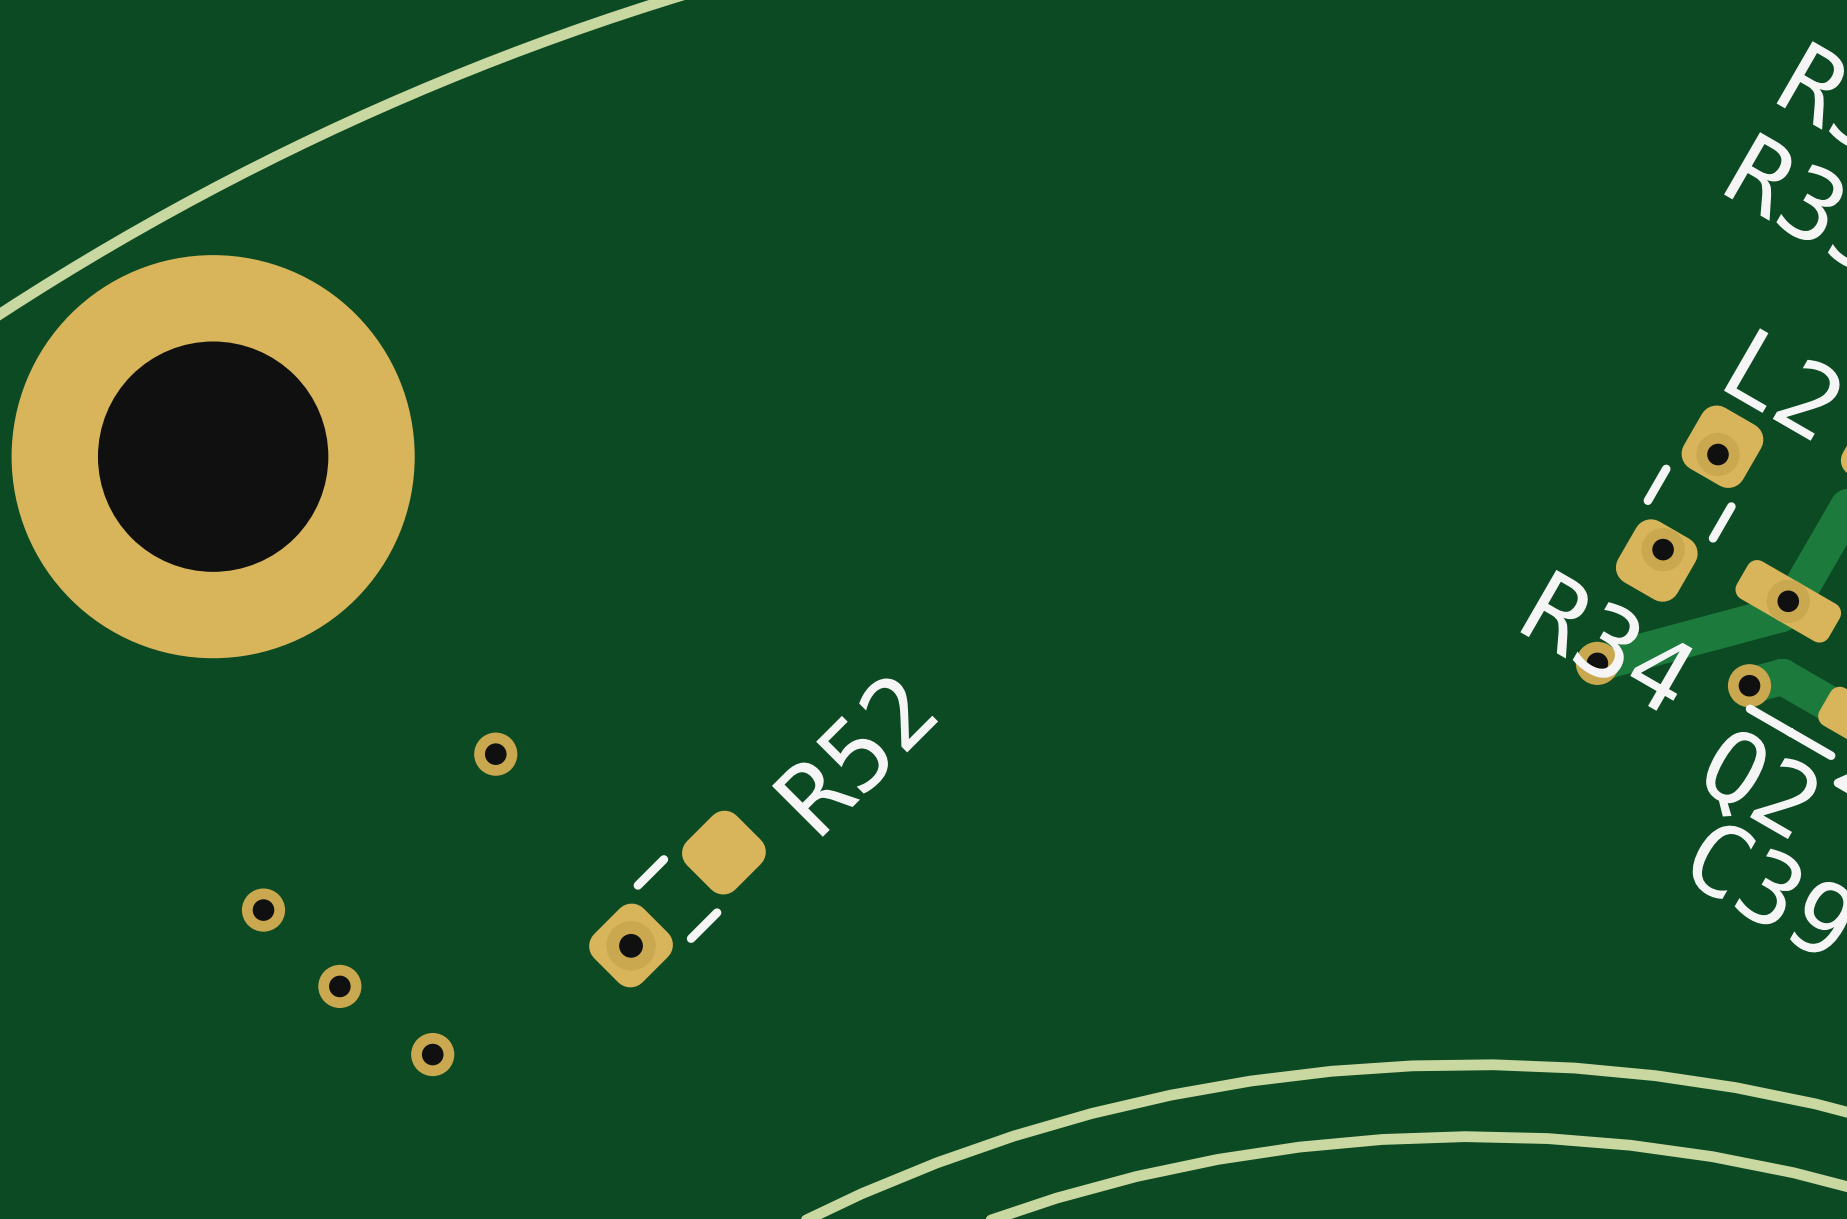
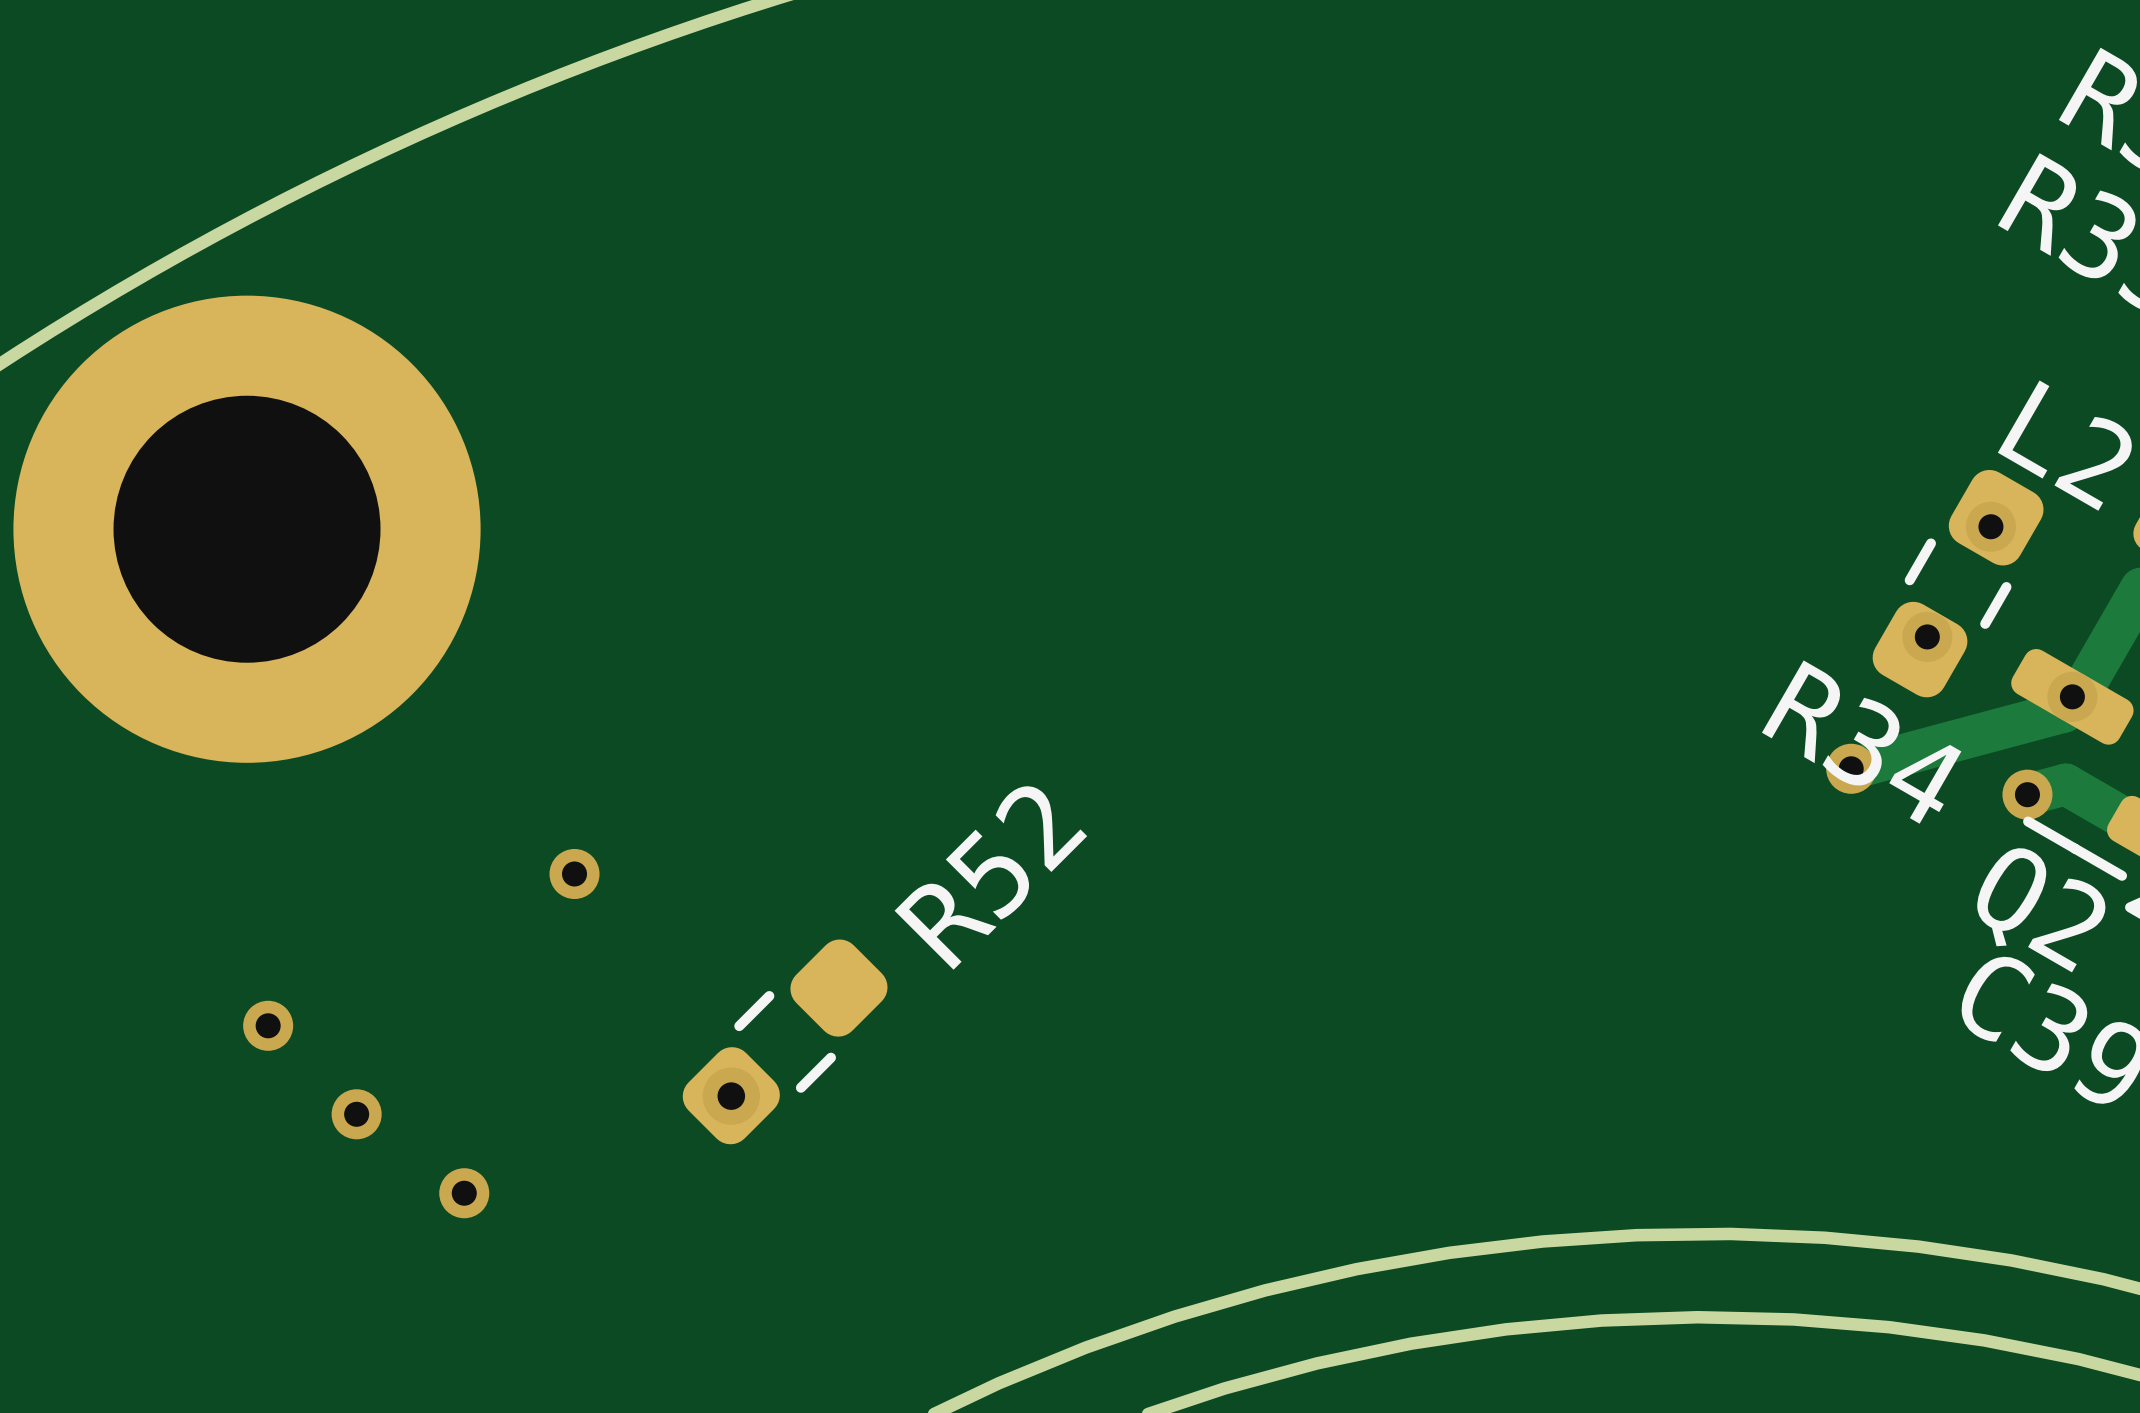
via position: (263, 910) -> (268, 1025)
via position: (339, 986) -> (356, 1114)
via position: (432, 1054) -> (464, 1193)

